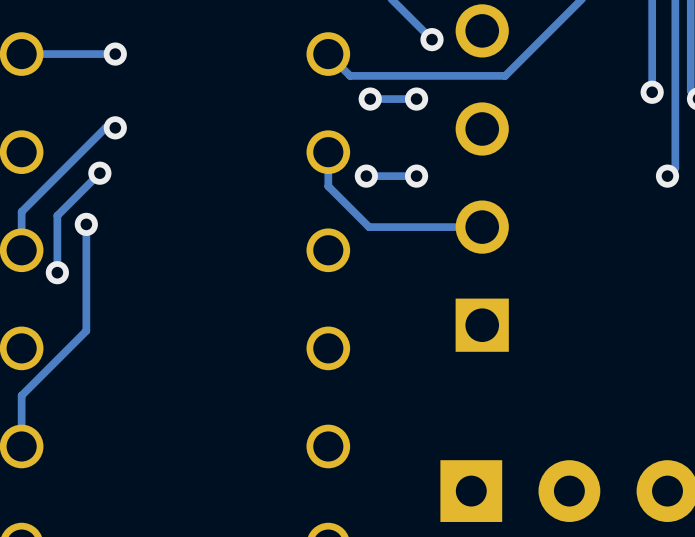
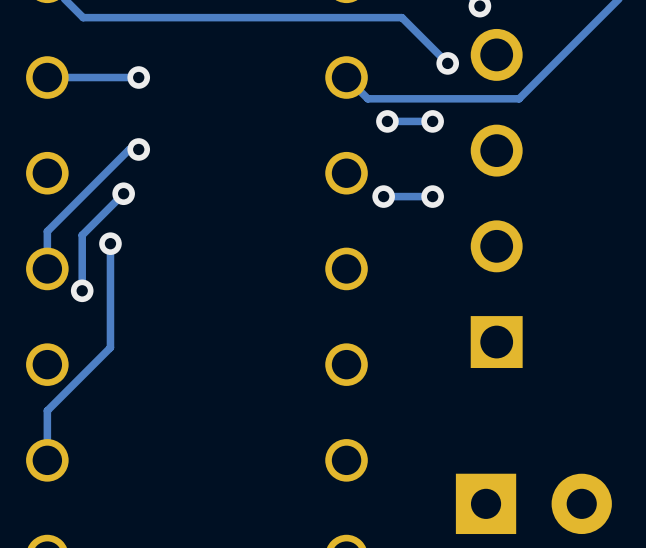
track: (328, 152) (328, 186) (369, 227) (482, 227) -> none

